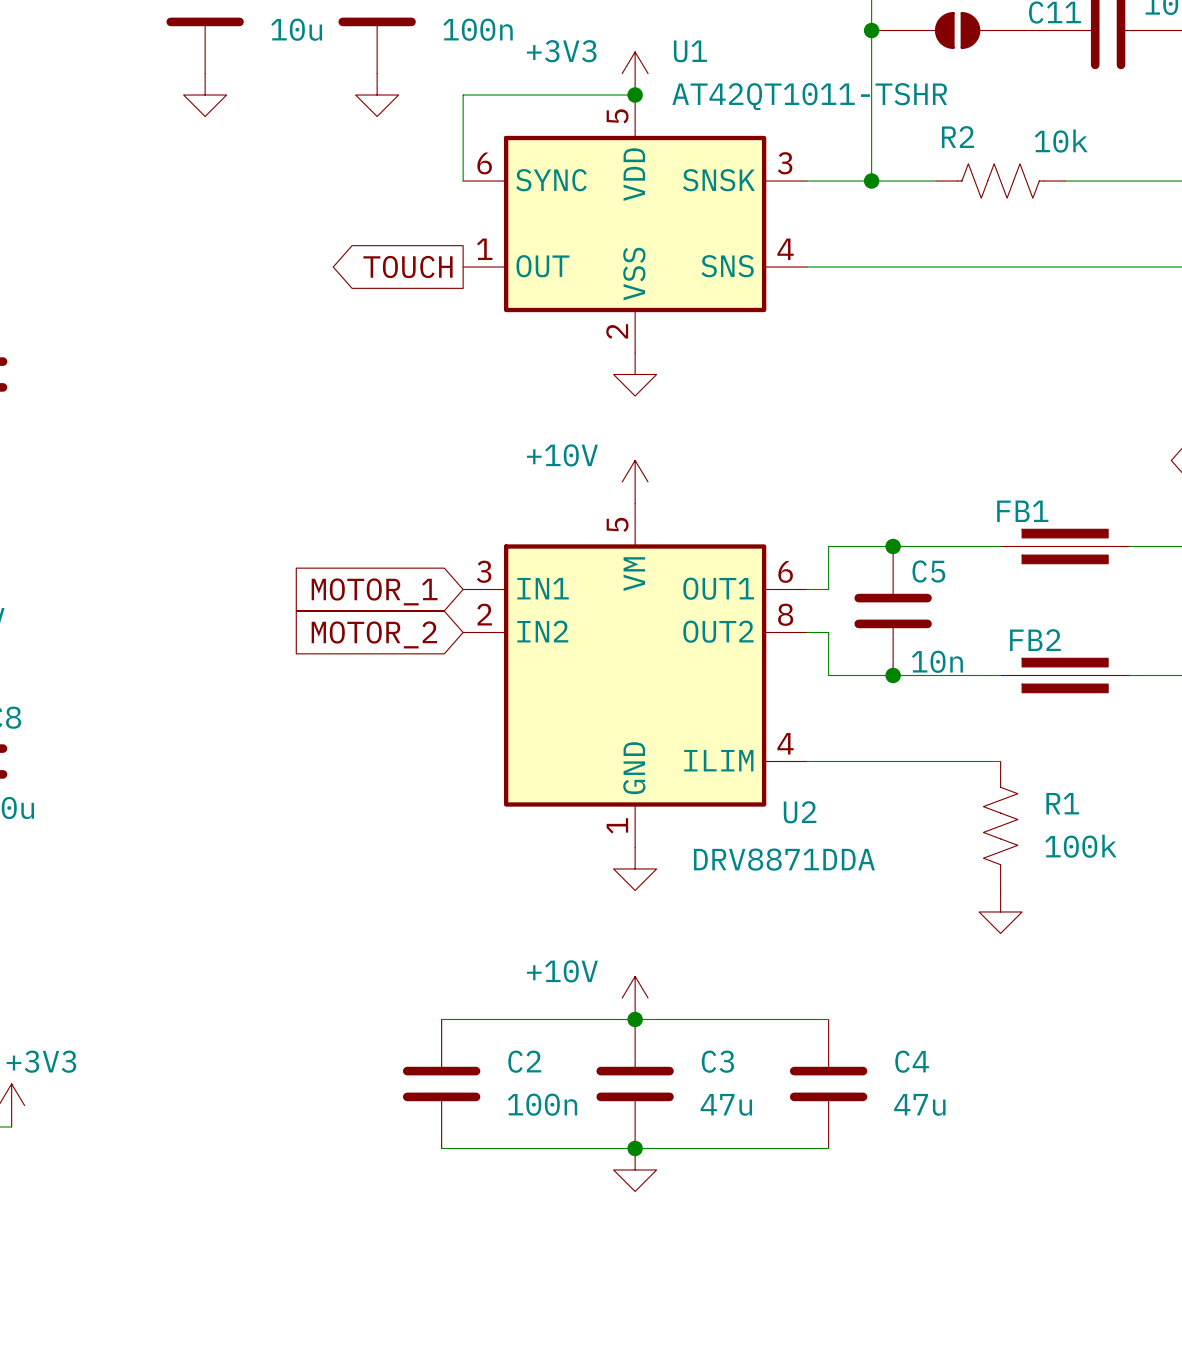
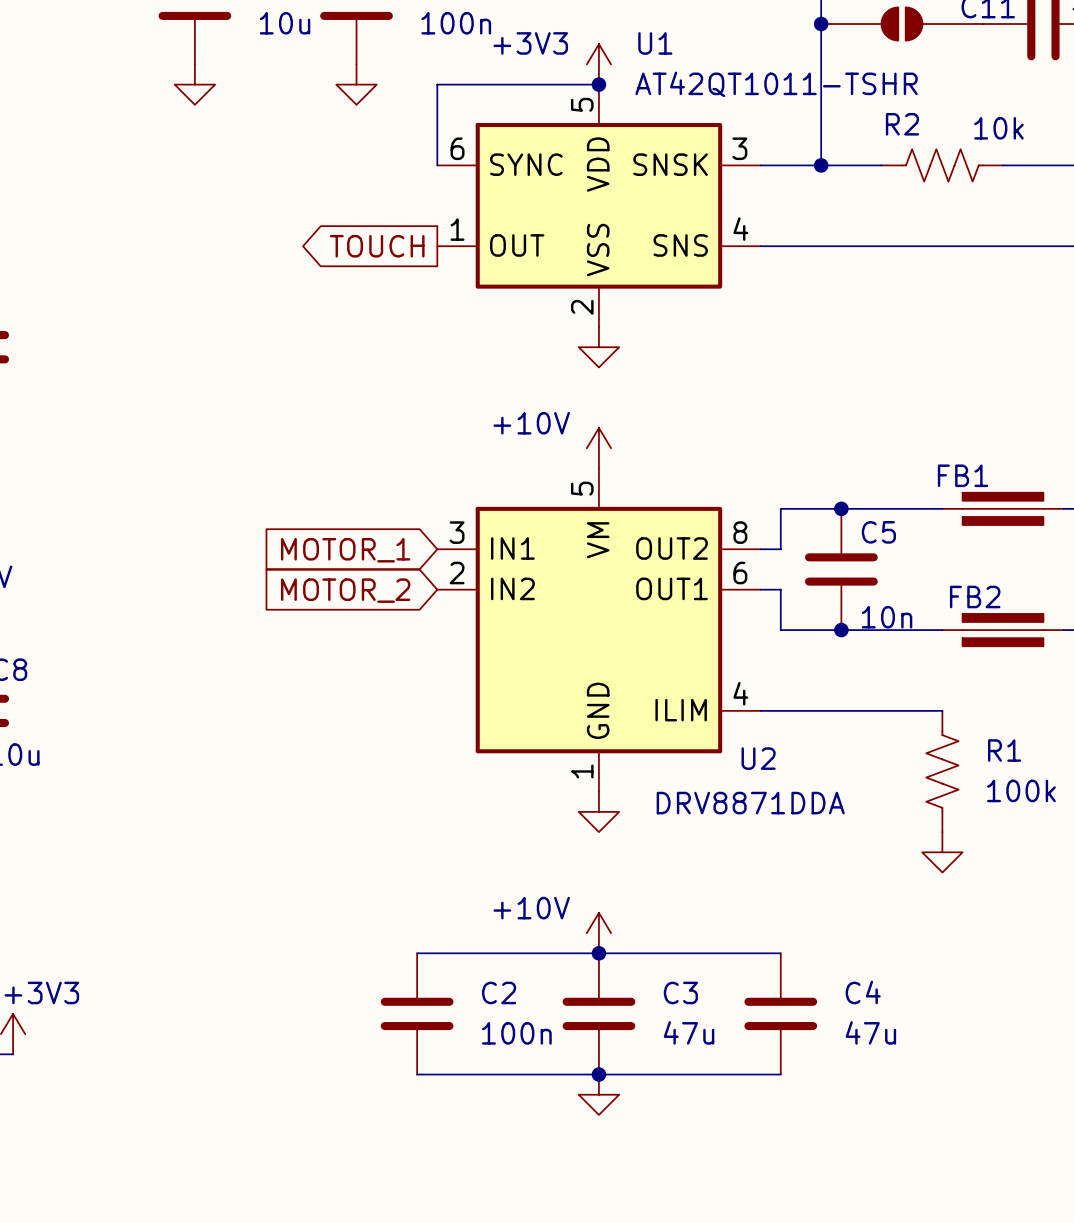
U2 pin number: 6 (785, 571) -> 8 (740, 532)
U2 pin name: OUT1 (718, 588) -> OUT2 (672, 548)
U2 pin number: 8 (785, 614) -> 6 (740, 573)
U2 pin name: OUT2 (718, 631) -> OUT1 (672, 588)

